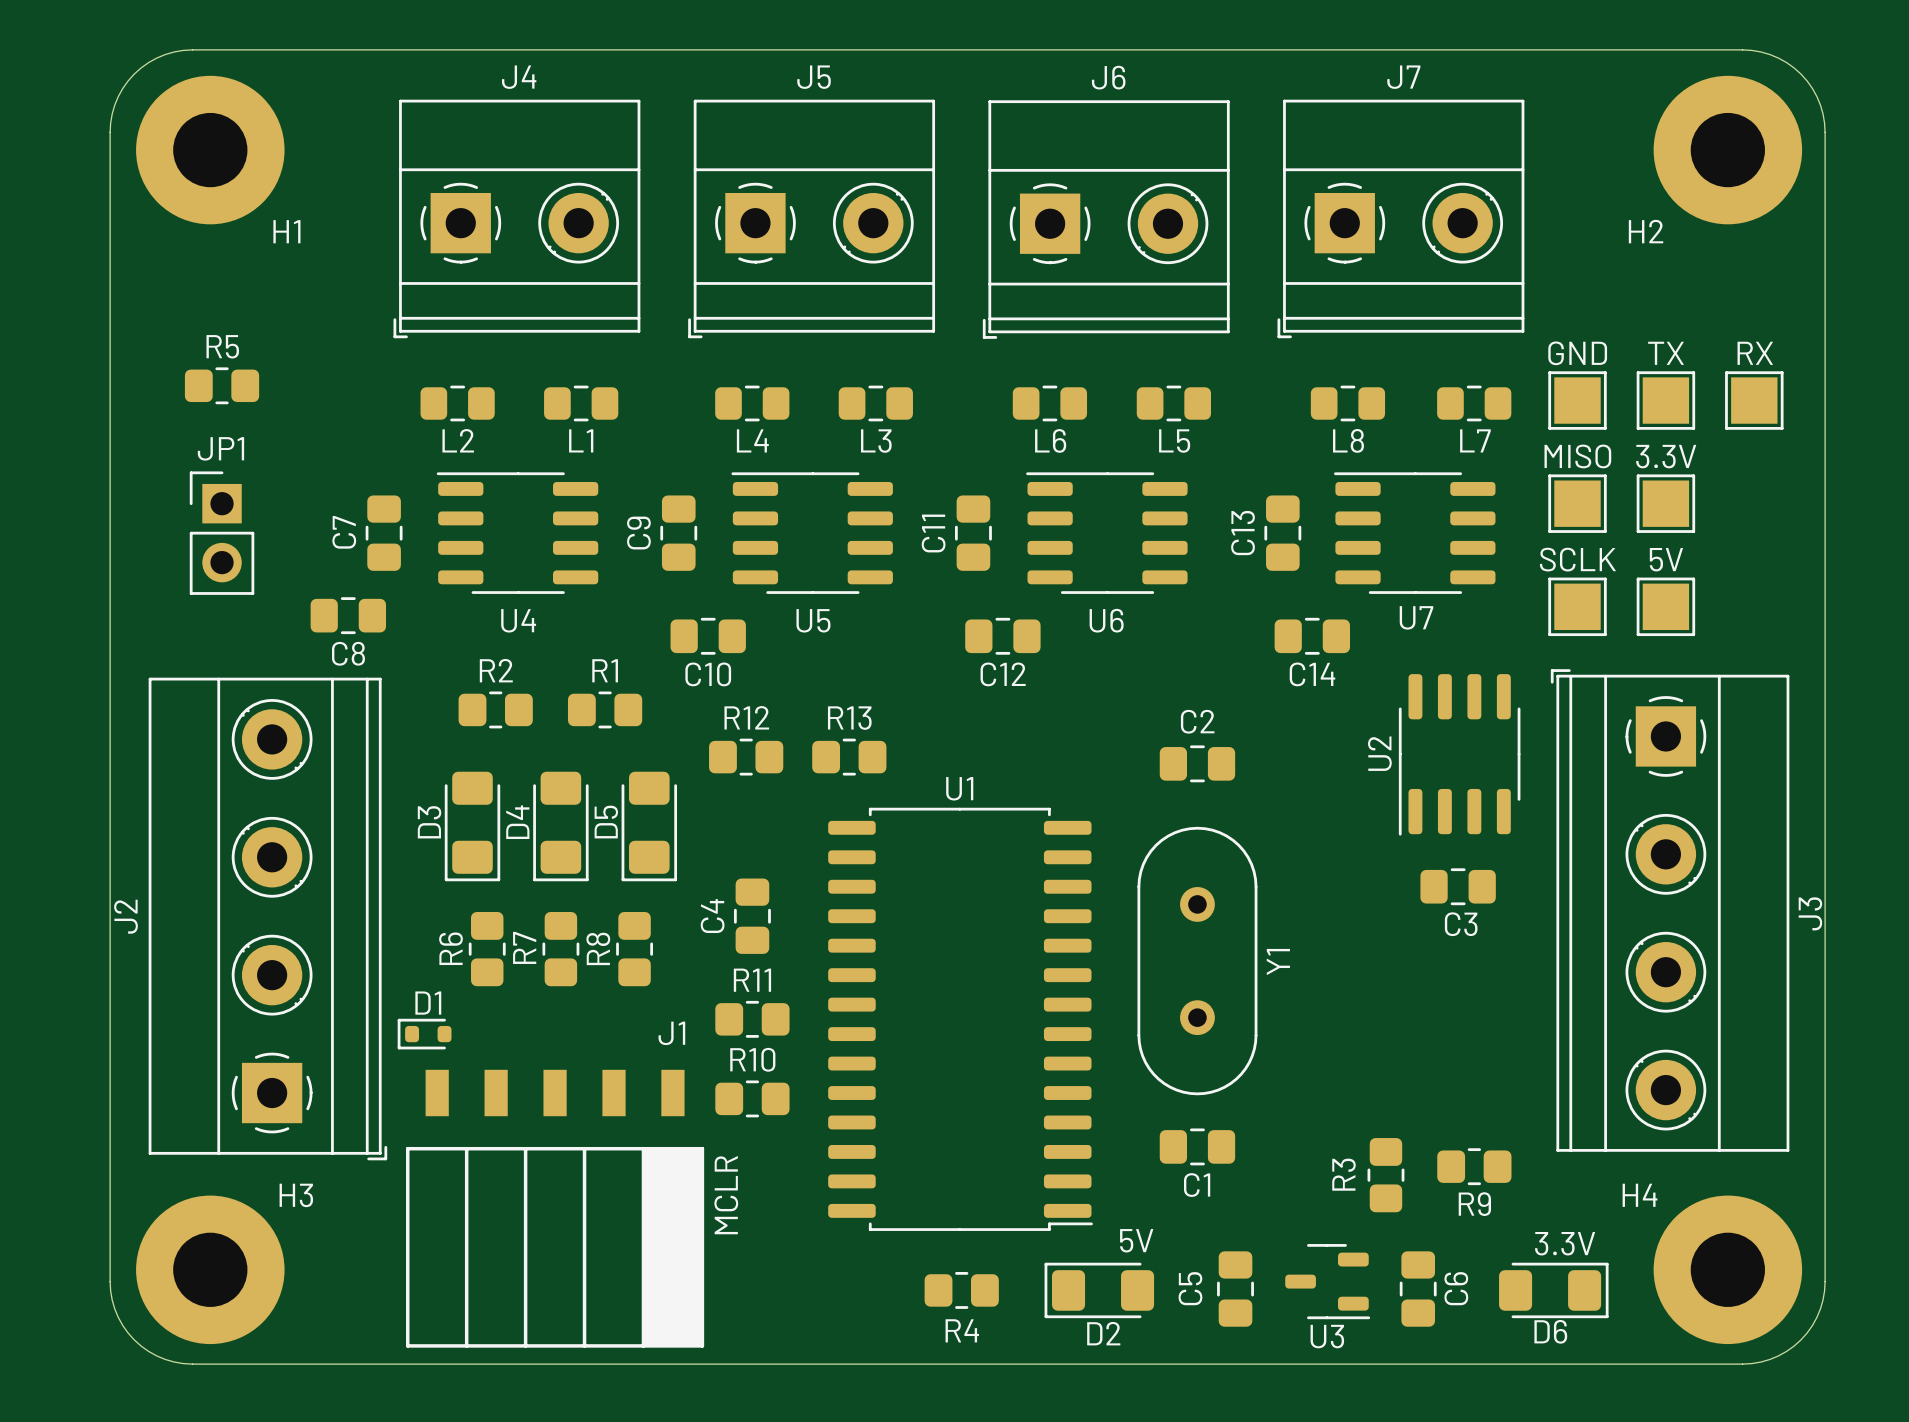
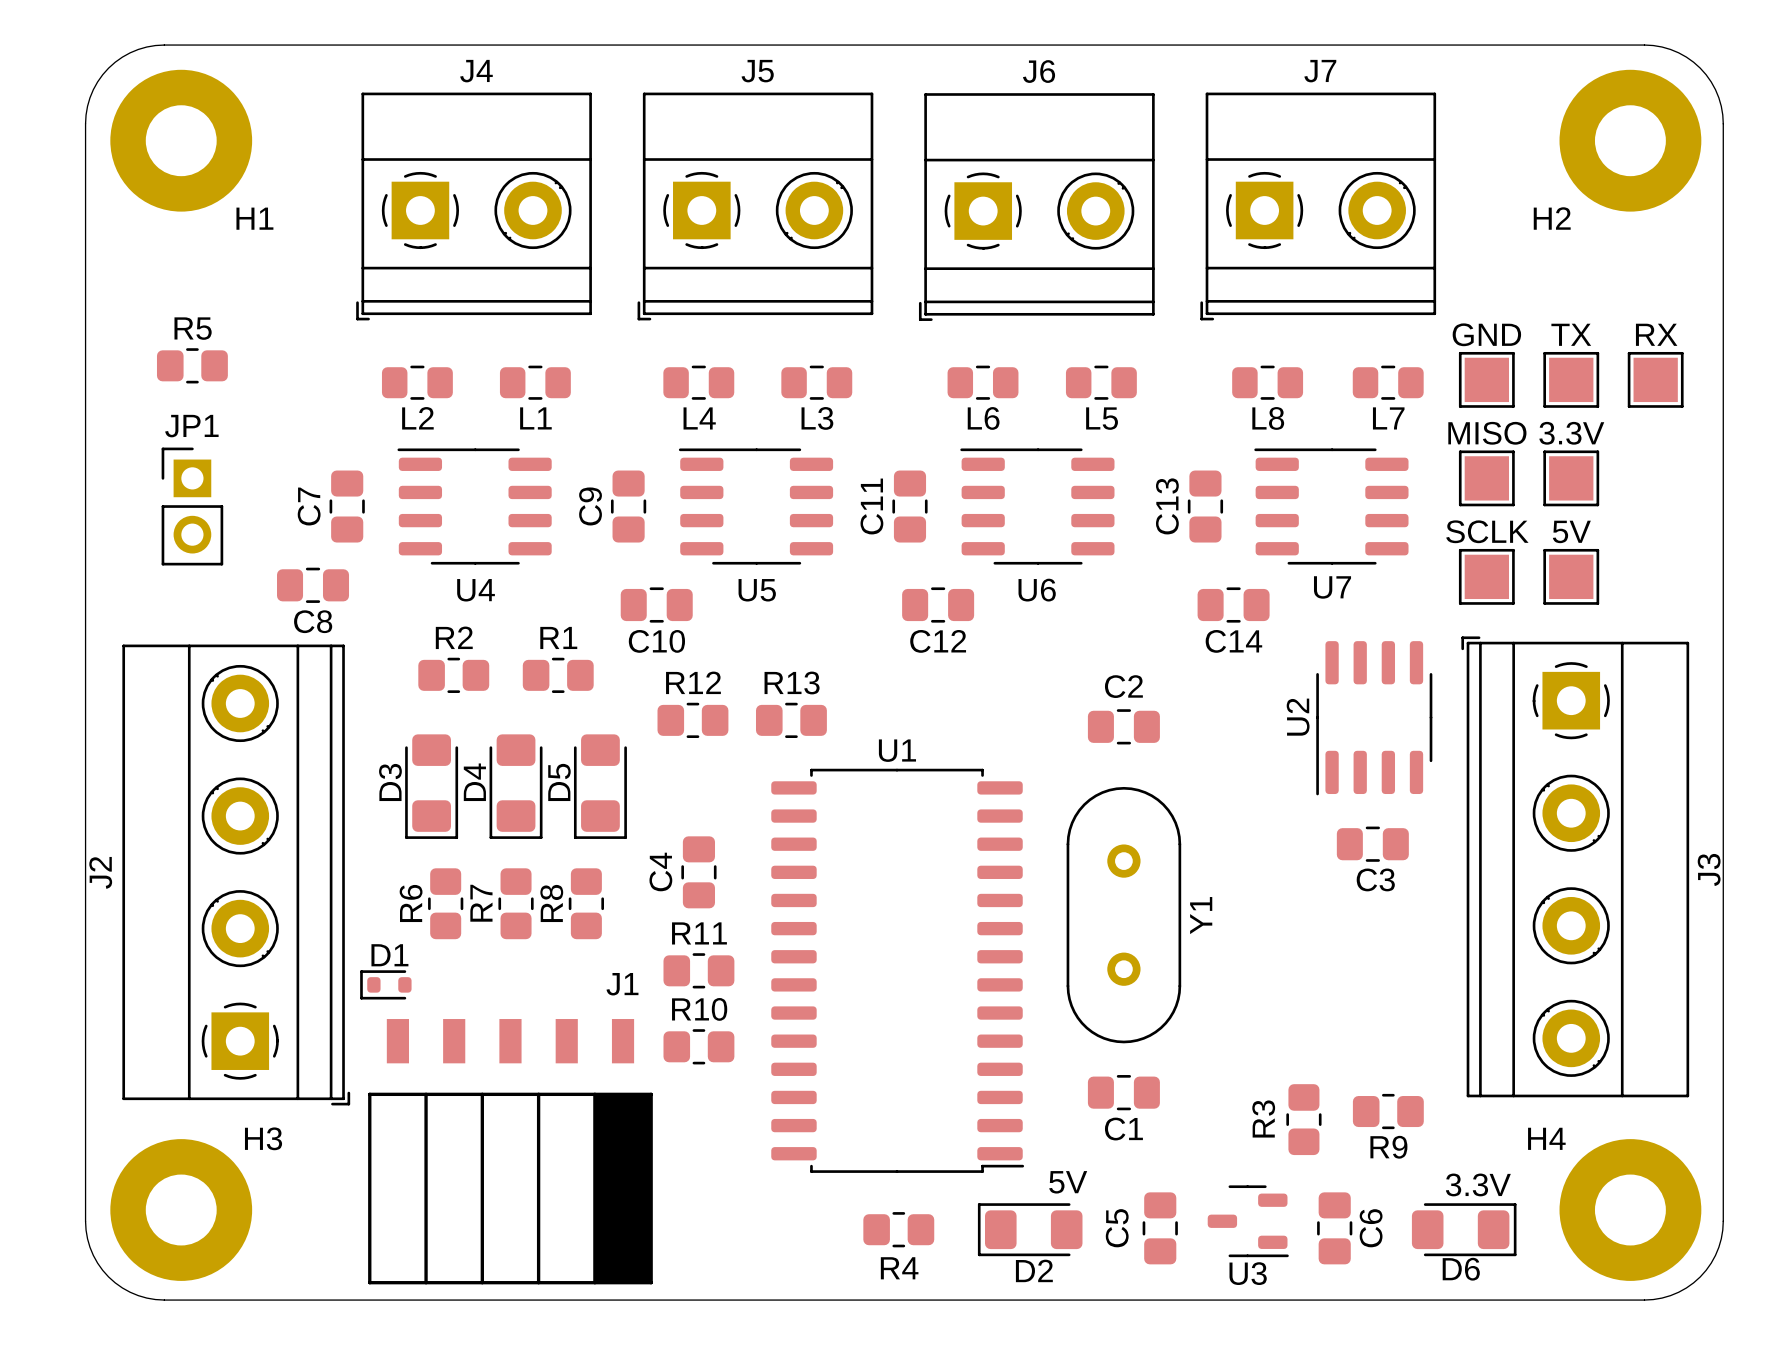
text: MCLR (726, 1195) -> none

